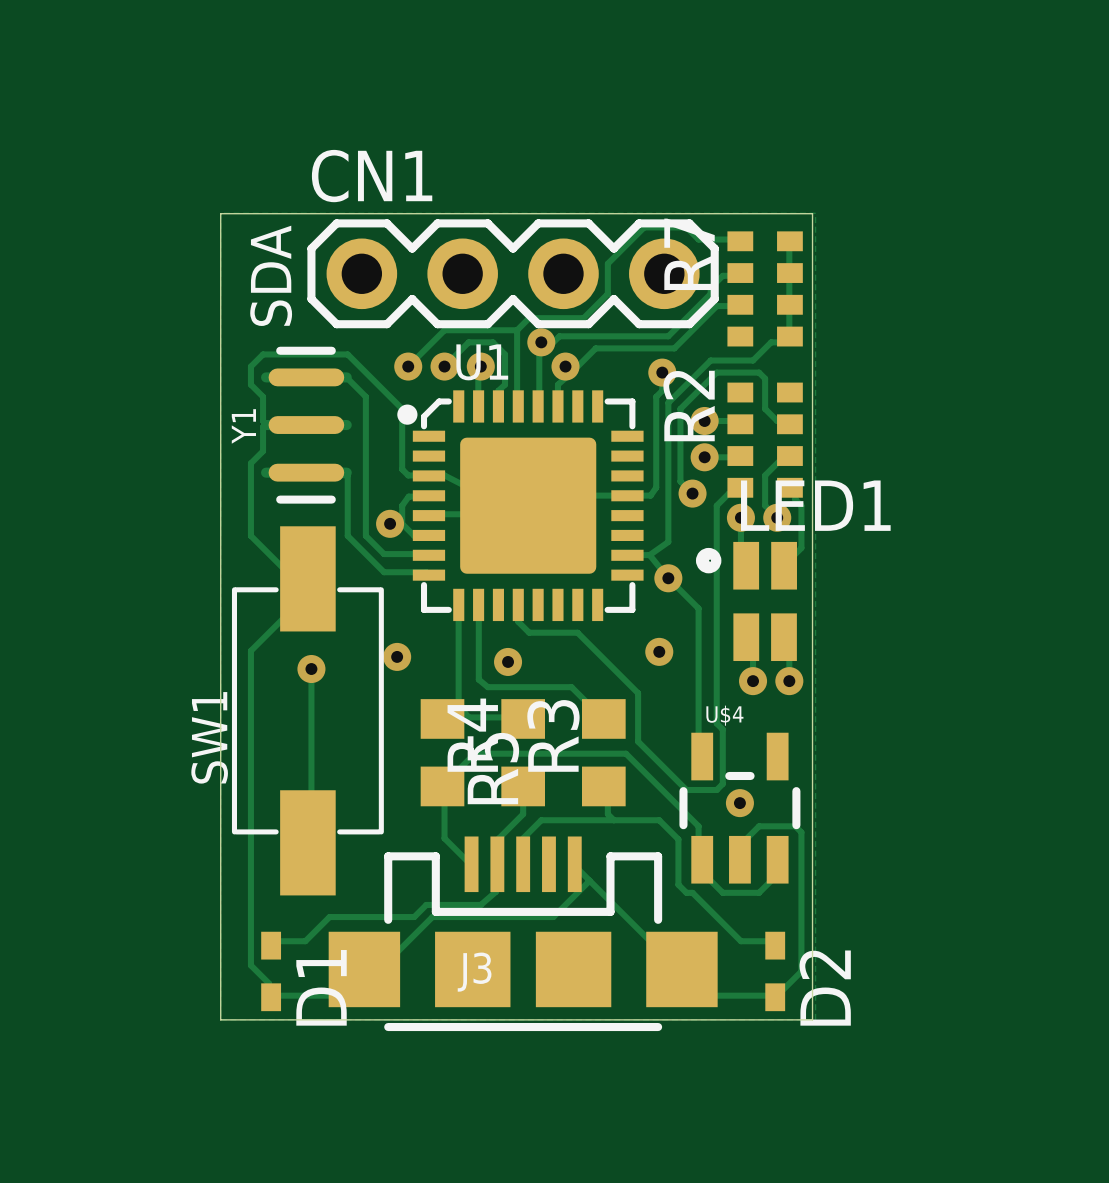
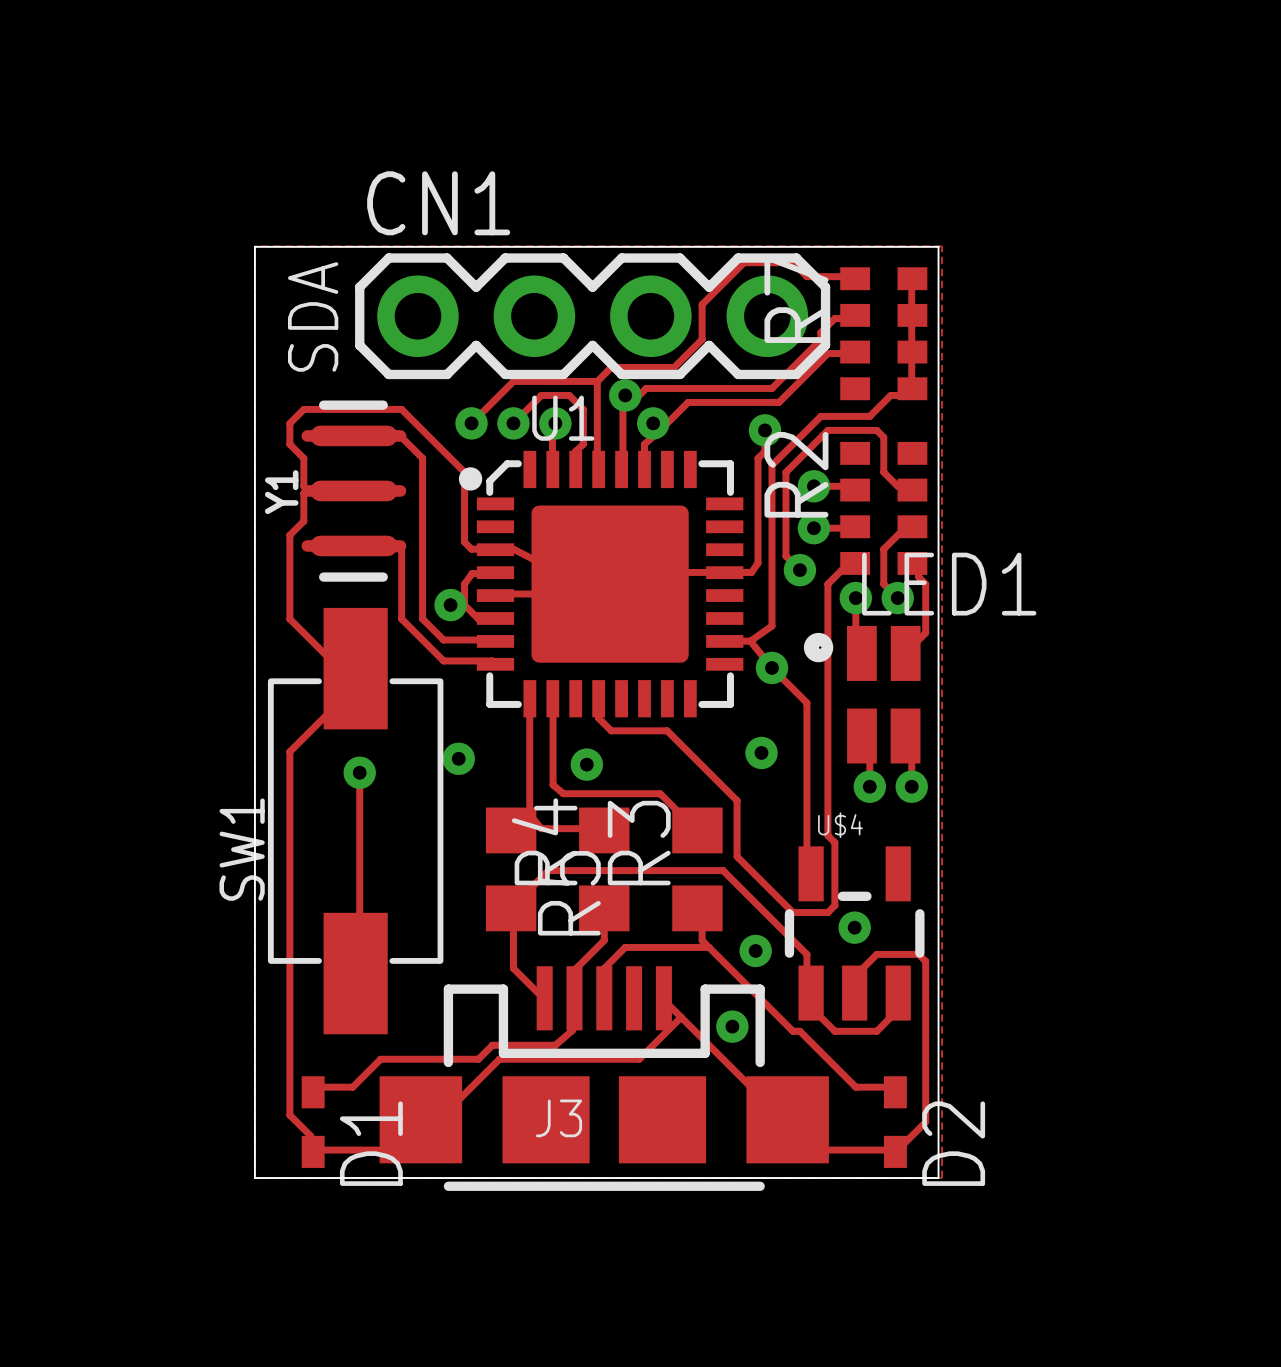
track: (613, 820) (659, 820) (678, 839) (678, 884) -> (709, 947) (783, 1021)
via: none -> (755, 950)
via: none -> (732, 1026)

